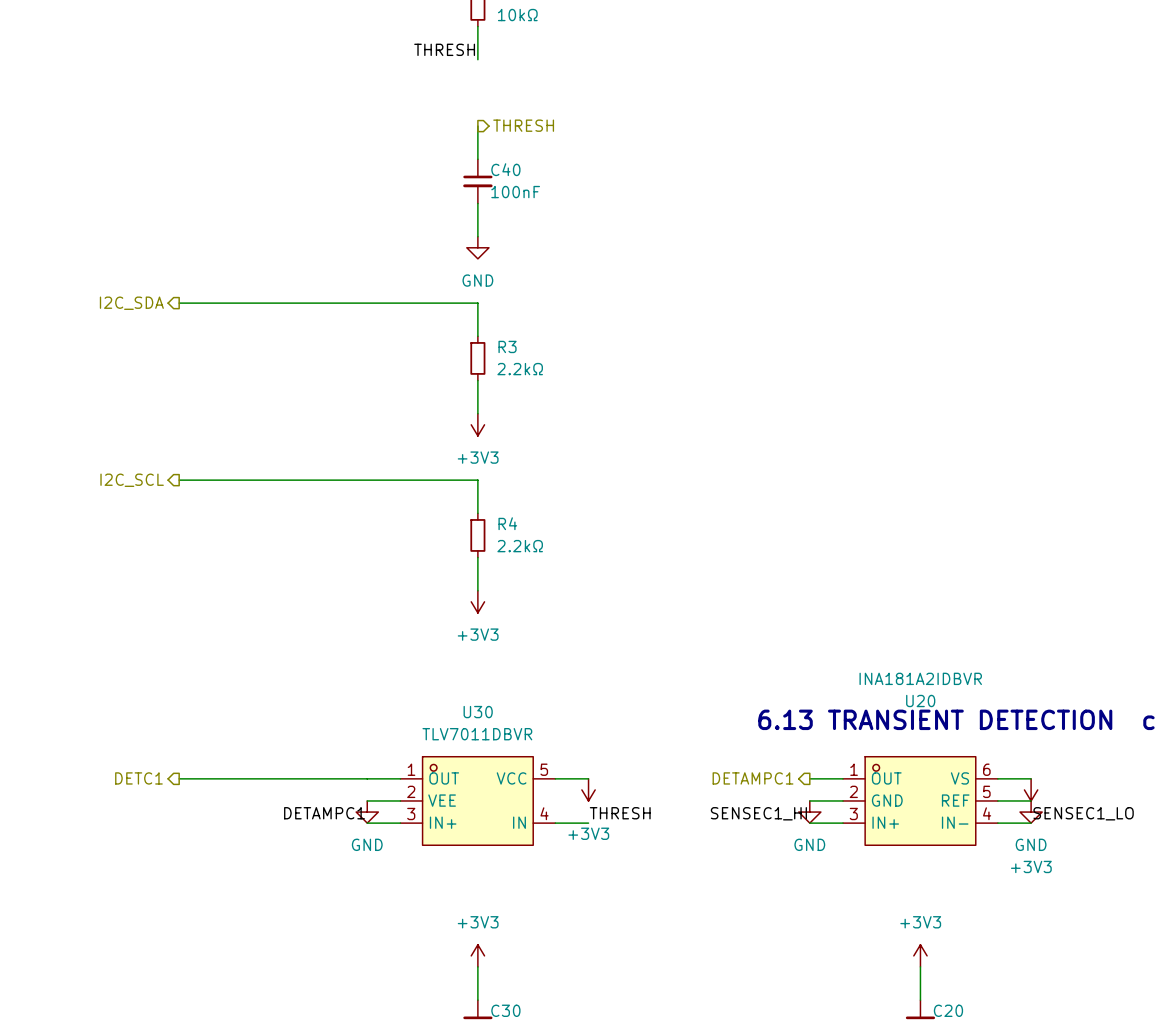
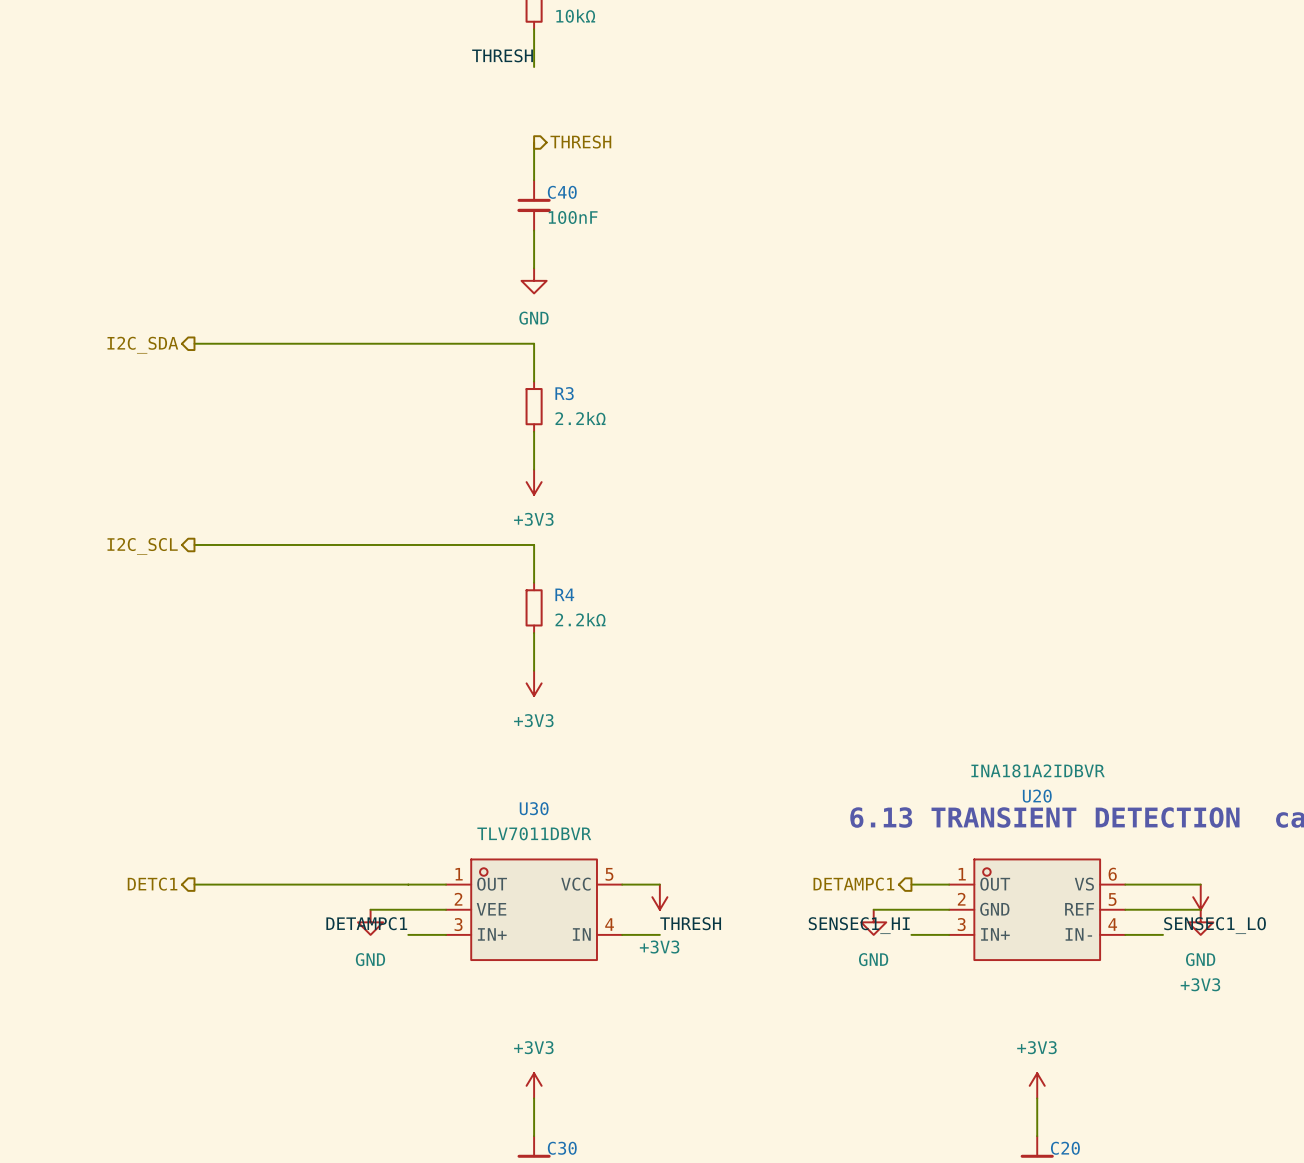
wire: none -> (1163, 884) (1200, 884)
power symbol position: +3V3 (1031, 789) -> +3V3 (1200, 897)
wire: none -> (370, 909) (408, 909)
wire: none -> (873, 909) (911, 909)
wire: none -> (1163, 909) (1200, 909)
power symbol position: GND (367, 812) -> GND (370, 922)
power symbol position: GND (809, 812) -> GND (873, 922)
power symbol position: GND (1031, 812) -> GND (1200, 922)

